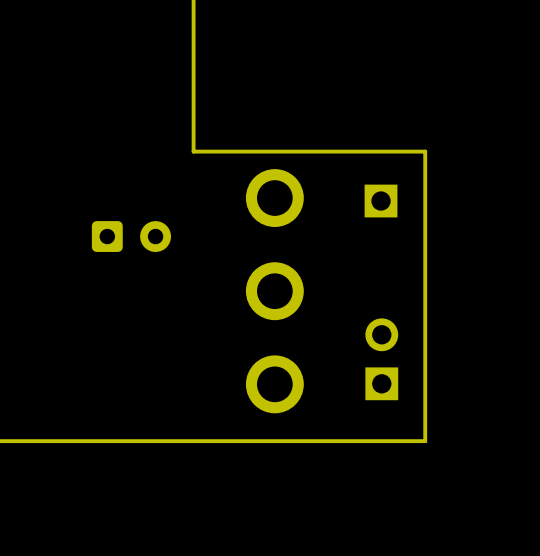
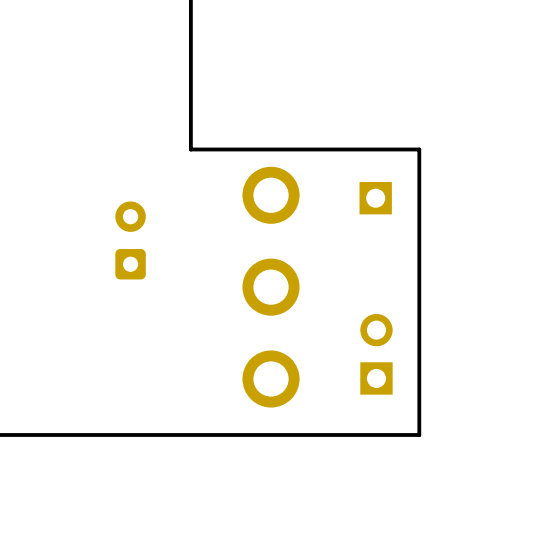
part rotation: 0° (131, 236) -> 90° counterclockwise (130, 240)

